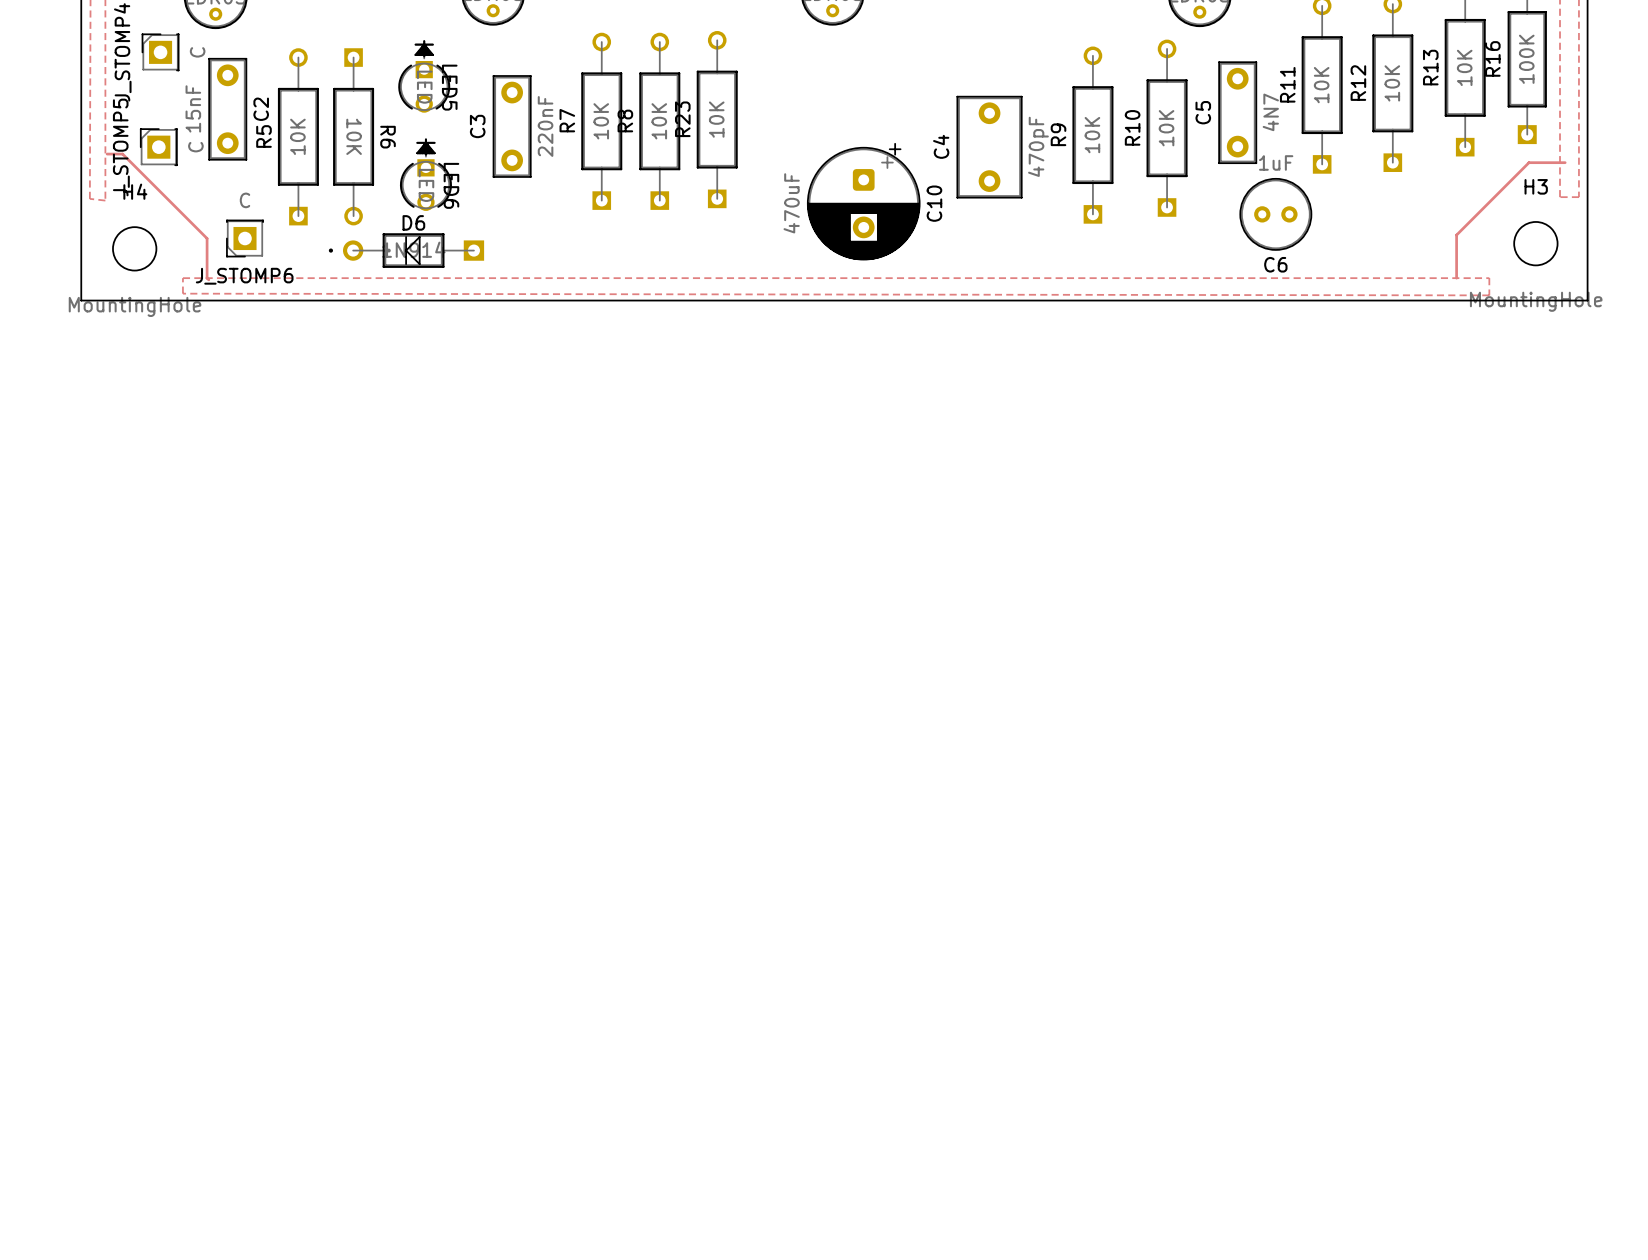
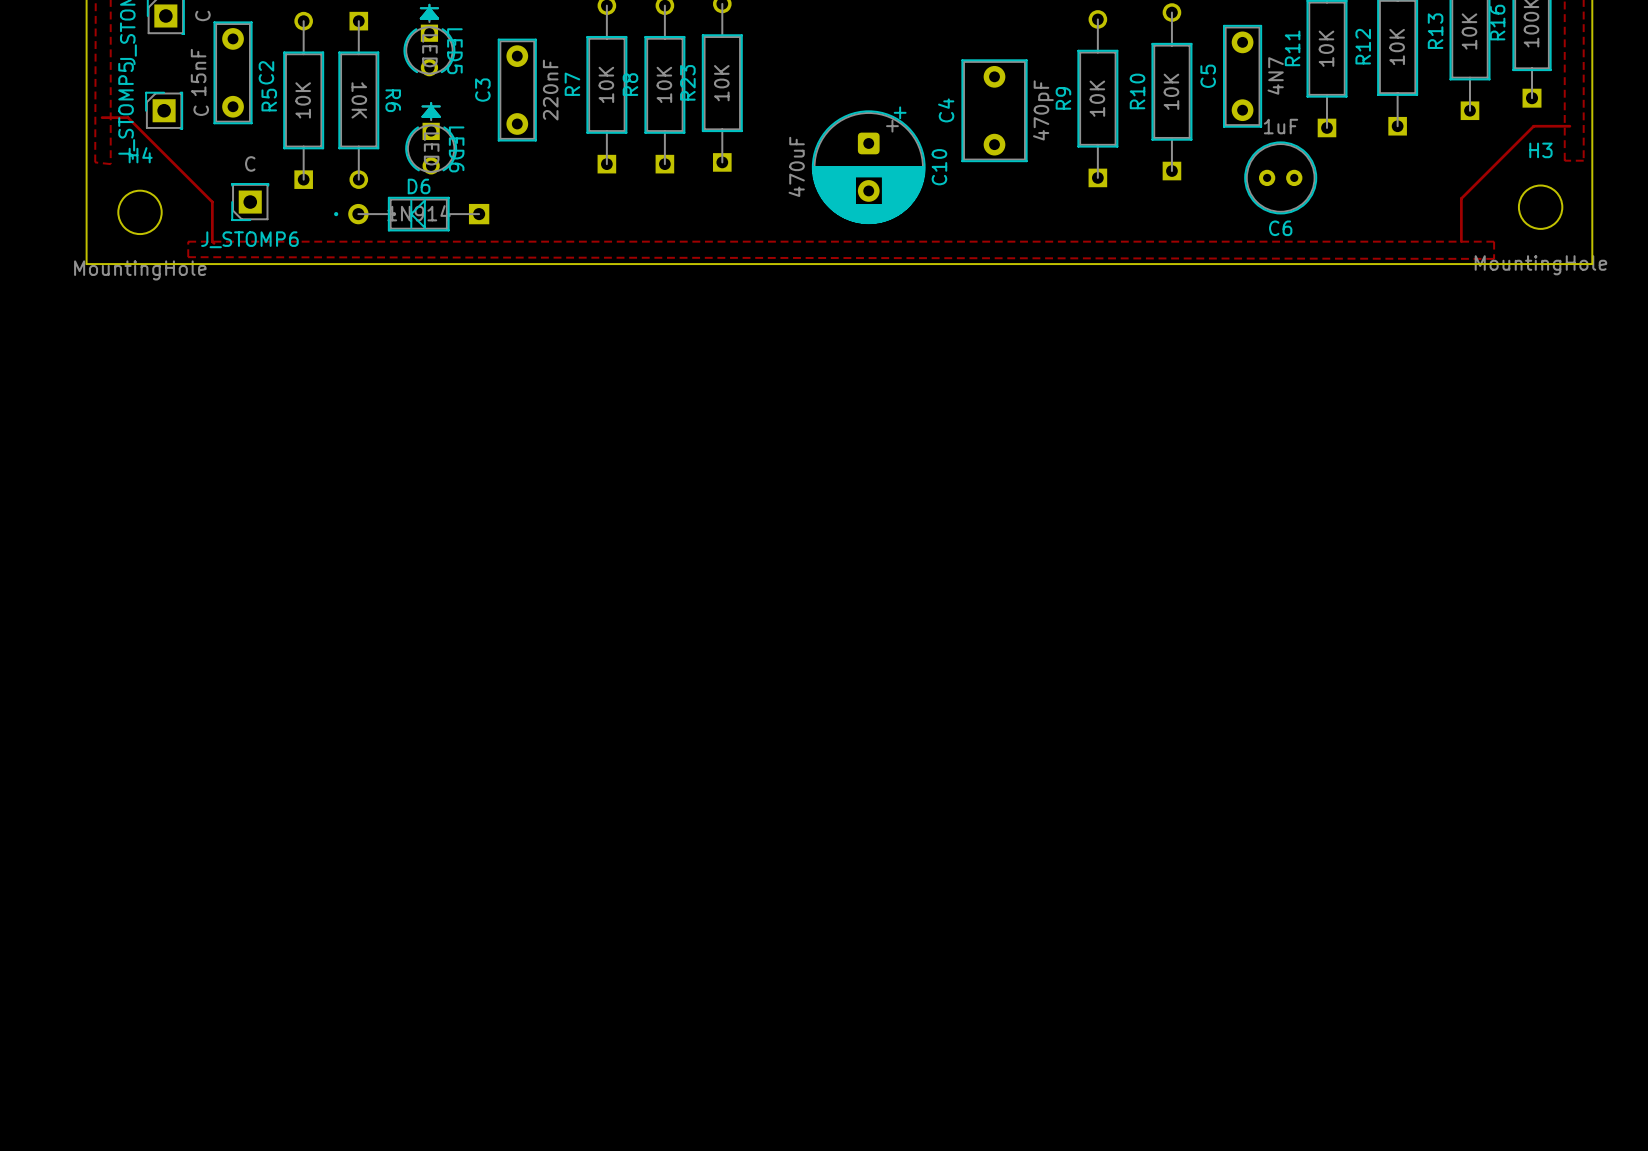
track: none -> (102, 117) (112, 117)

